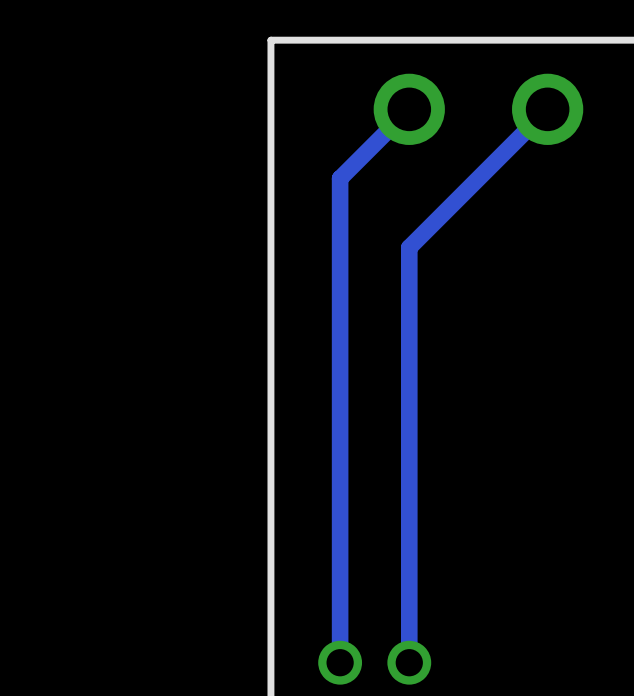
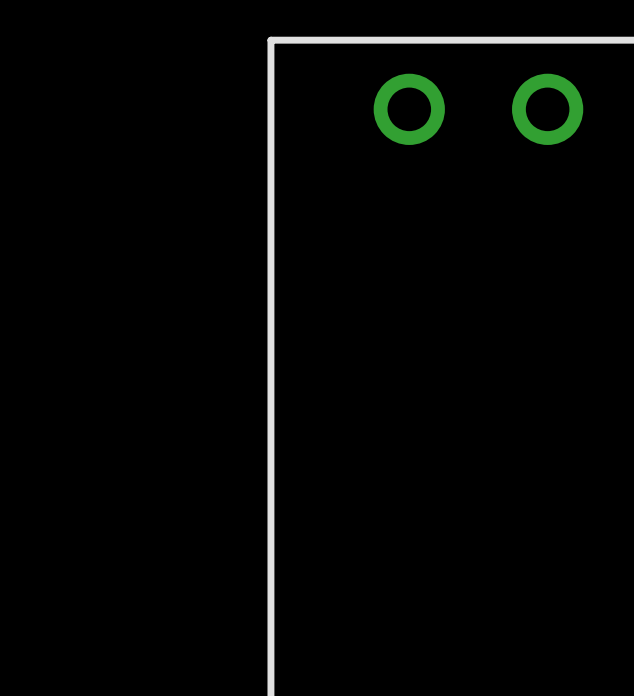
track: (409, 109) (340, 178) (340, 662) -> none
track: (547, 109) (409, 247) (409, 662) -> none
via: (340, 662) -> none
via: (409, 662) -> none

